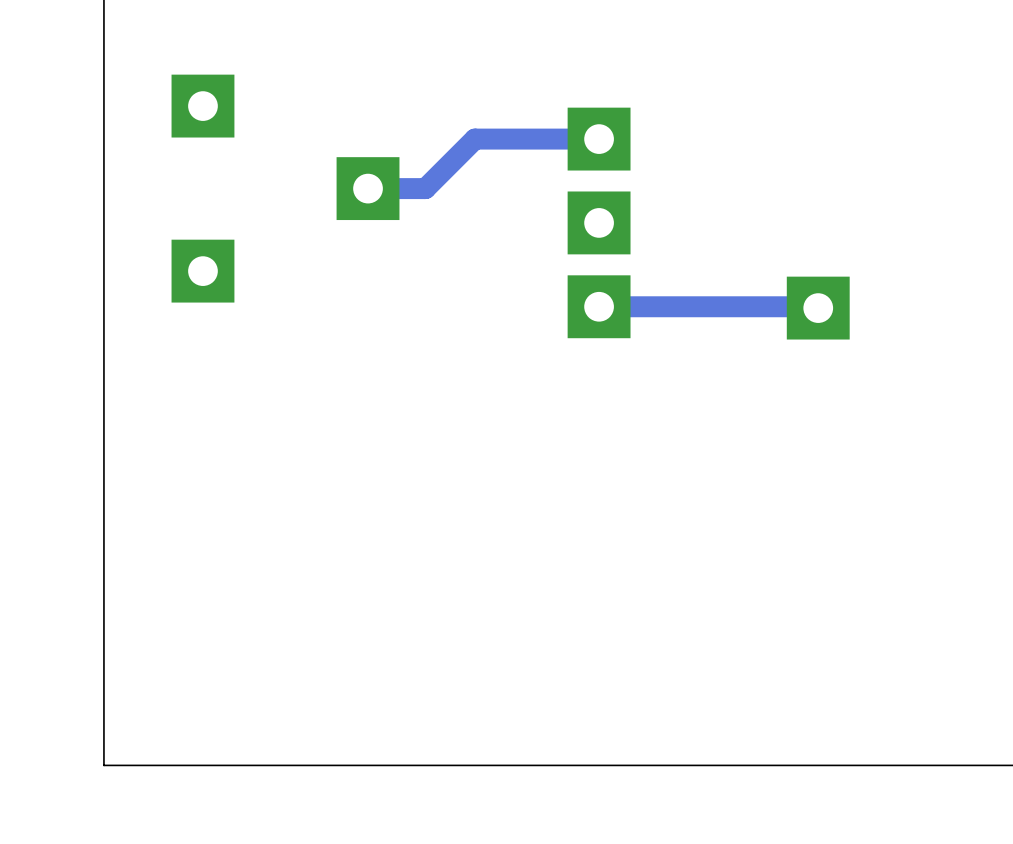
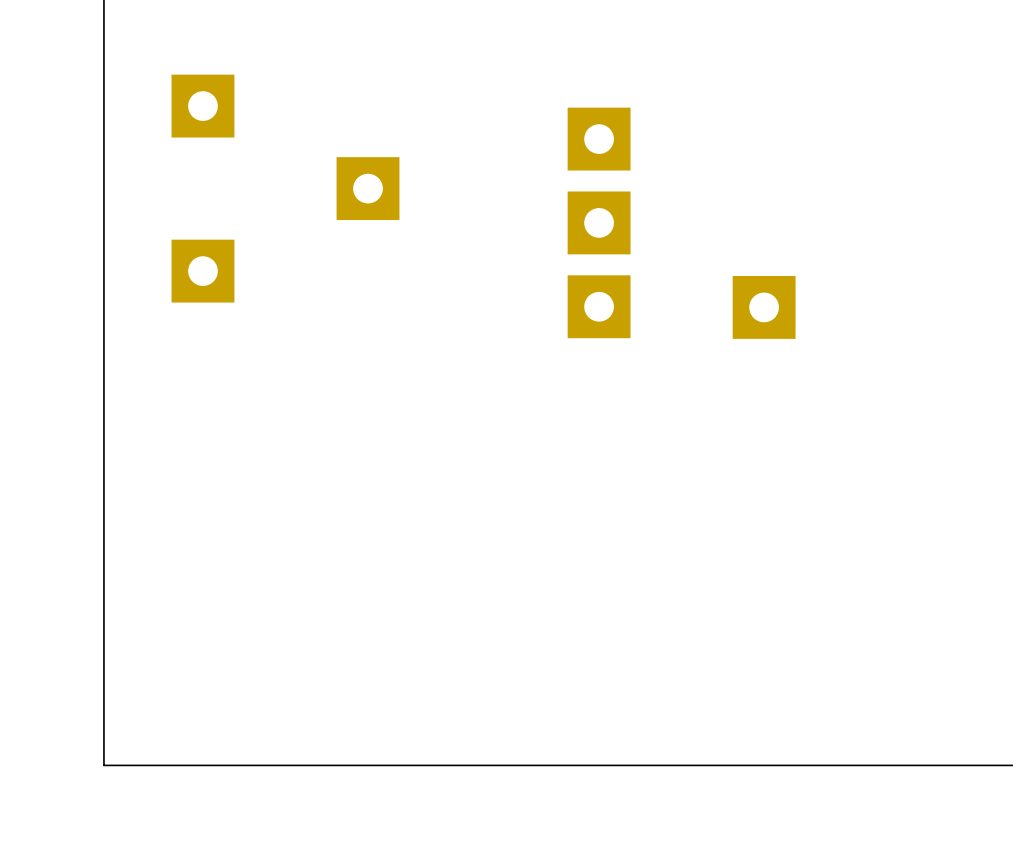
track: (599, 139) (474, 139) (425, 188) (368, 188) -> none
track: (599, 306) (818, 308) -> none
part position: (818, 308) -> (764, 307)

